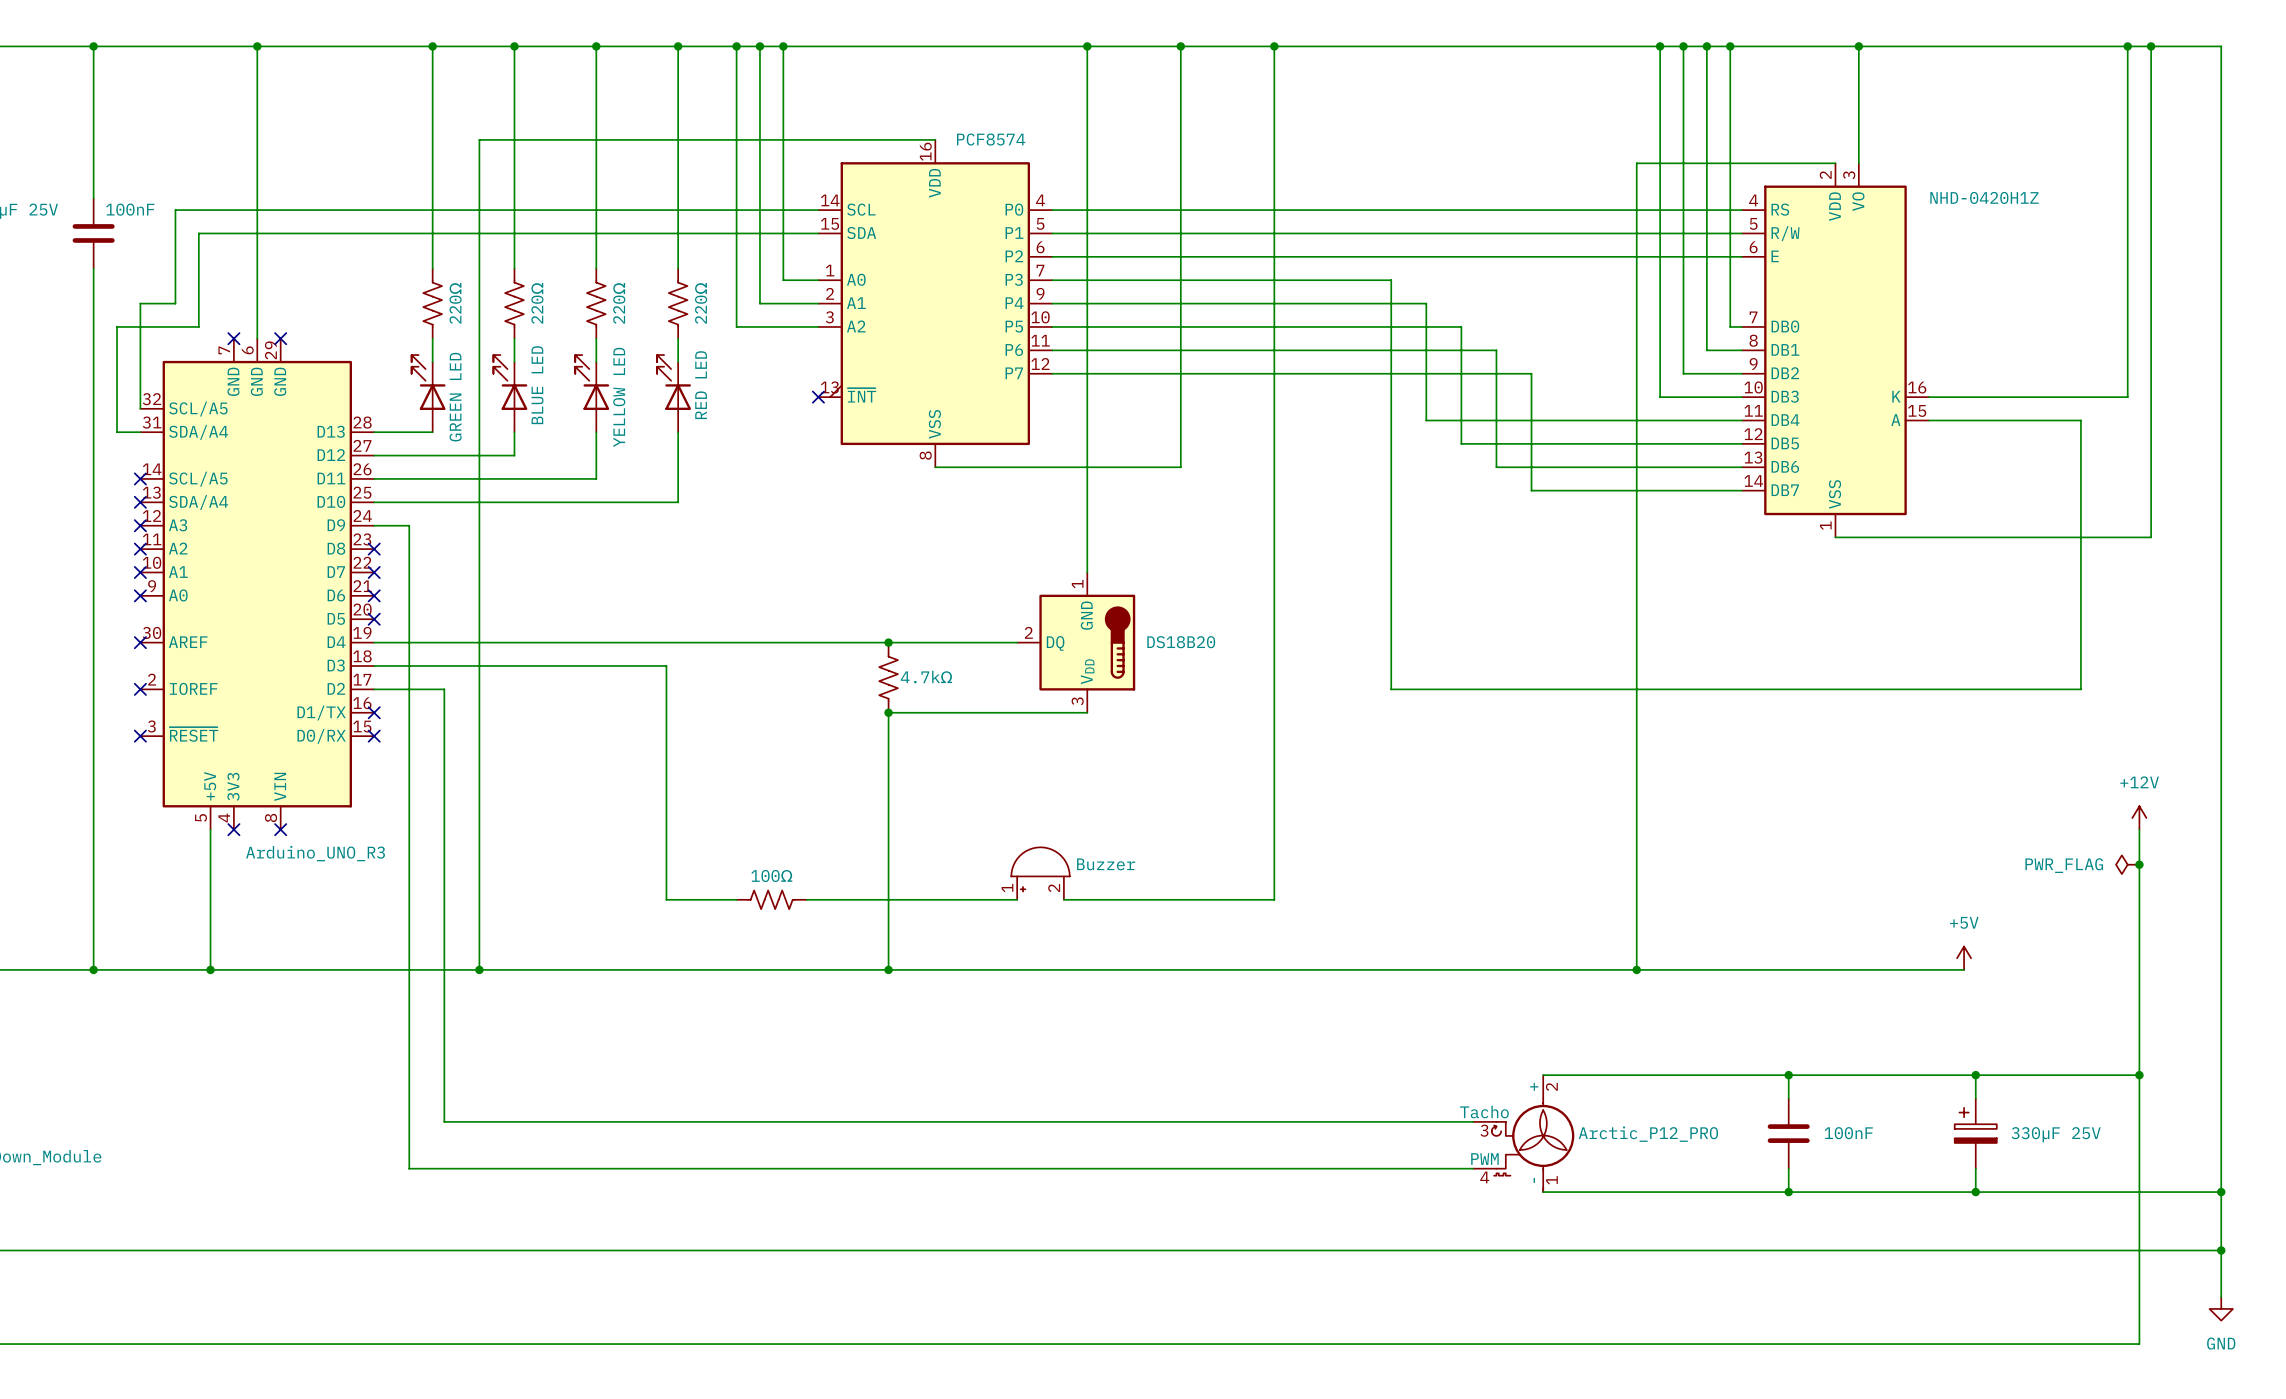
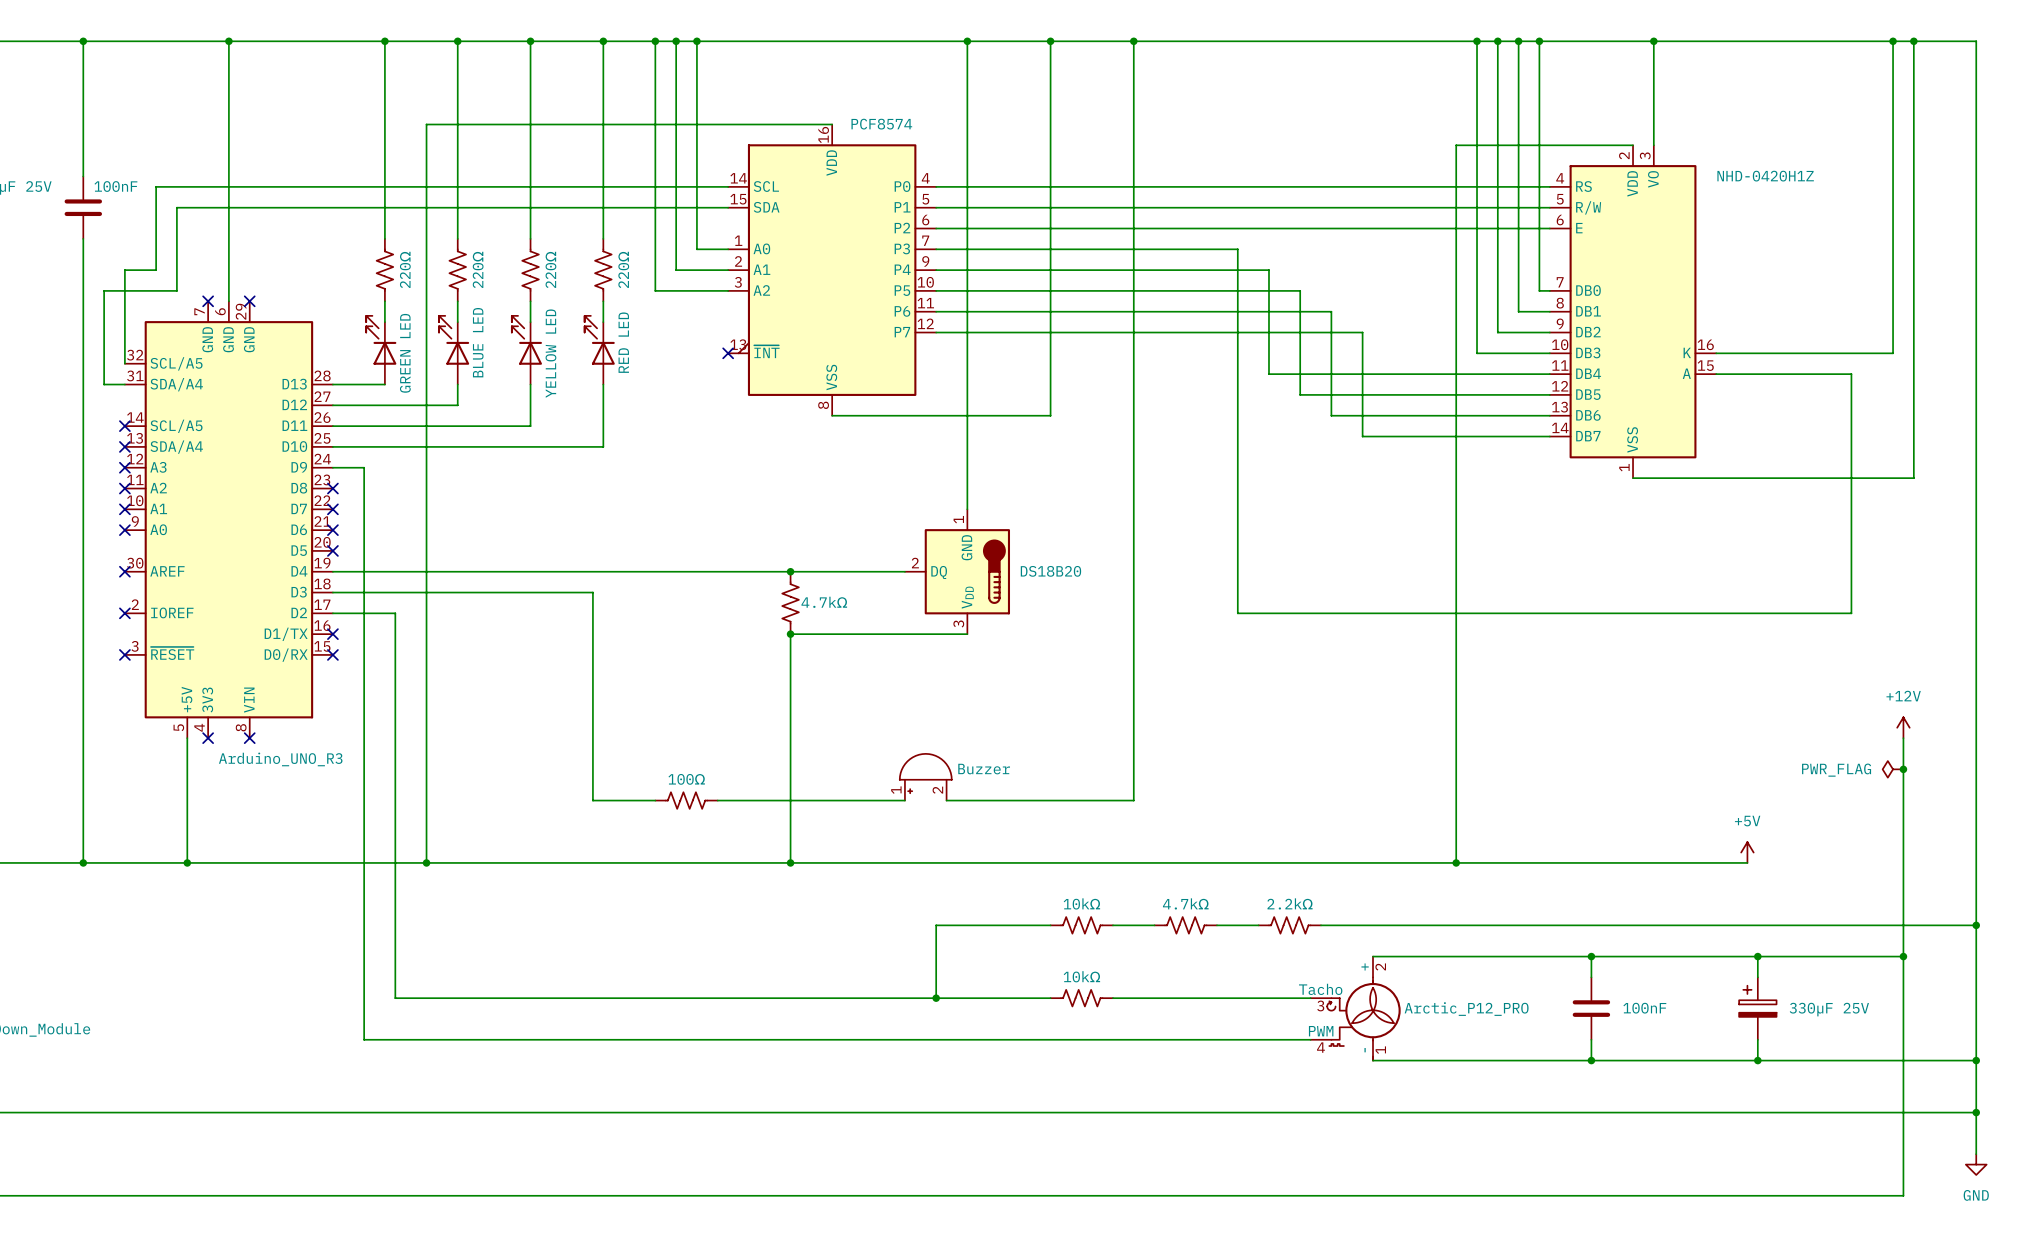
wire: none -> (1050, 925) (936, 925) (936, 998)
part: none -> 10kΩ (1081, 925)
wire: none -> (1112, 925) (1154, 925)
part: none -> 4.7kΩ (1185, 925)
wire: none -> (1216, 925) (1258, 925)
part: none -> 2.2kΩ (1289, 925)
wire: none -> (1320, 925) (1976, 925)
junction: none -> (1976, 925)
junction: none -> (936, 998)
part: none -> 10kΩ (1081, 998)

